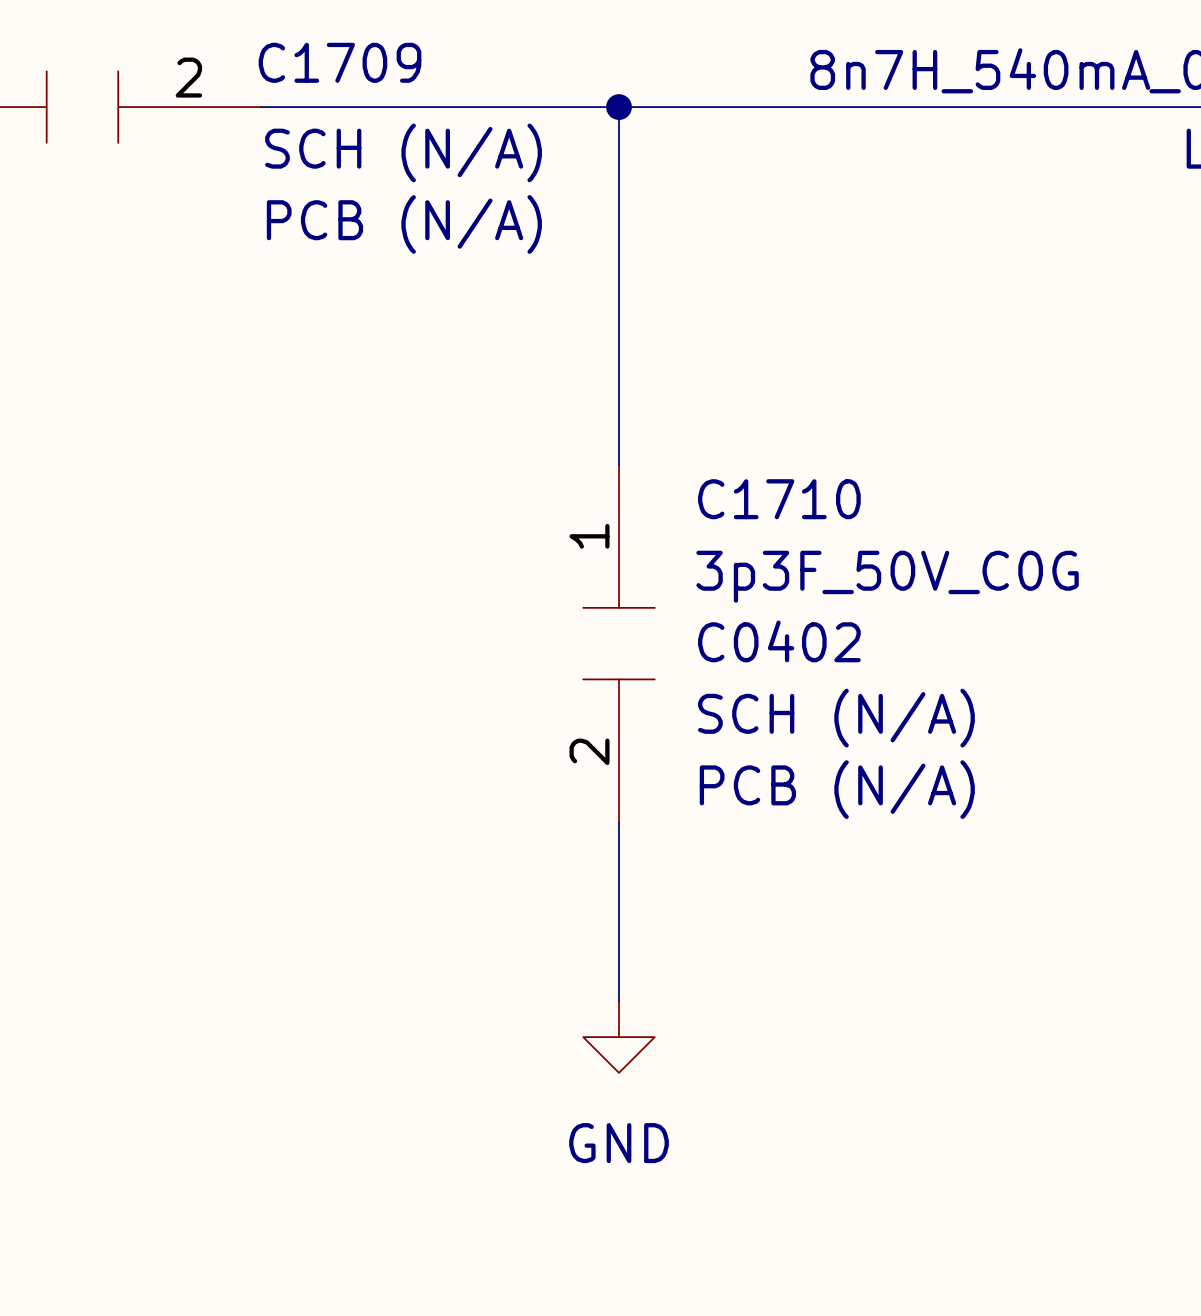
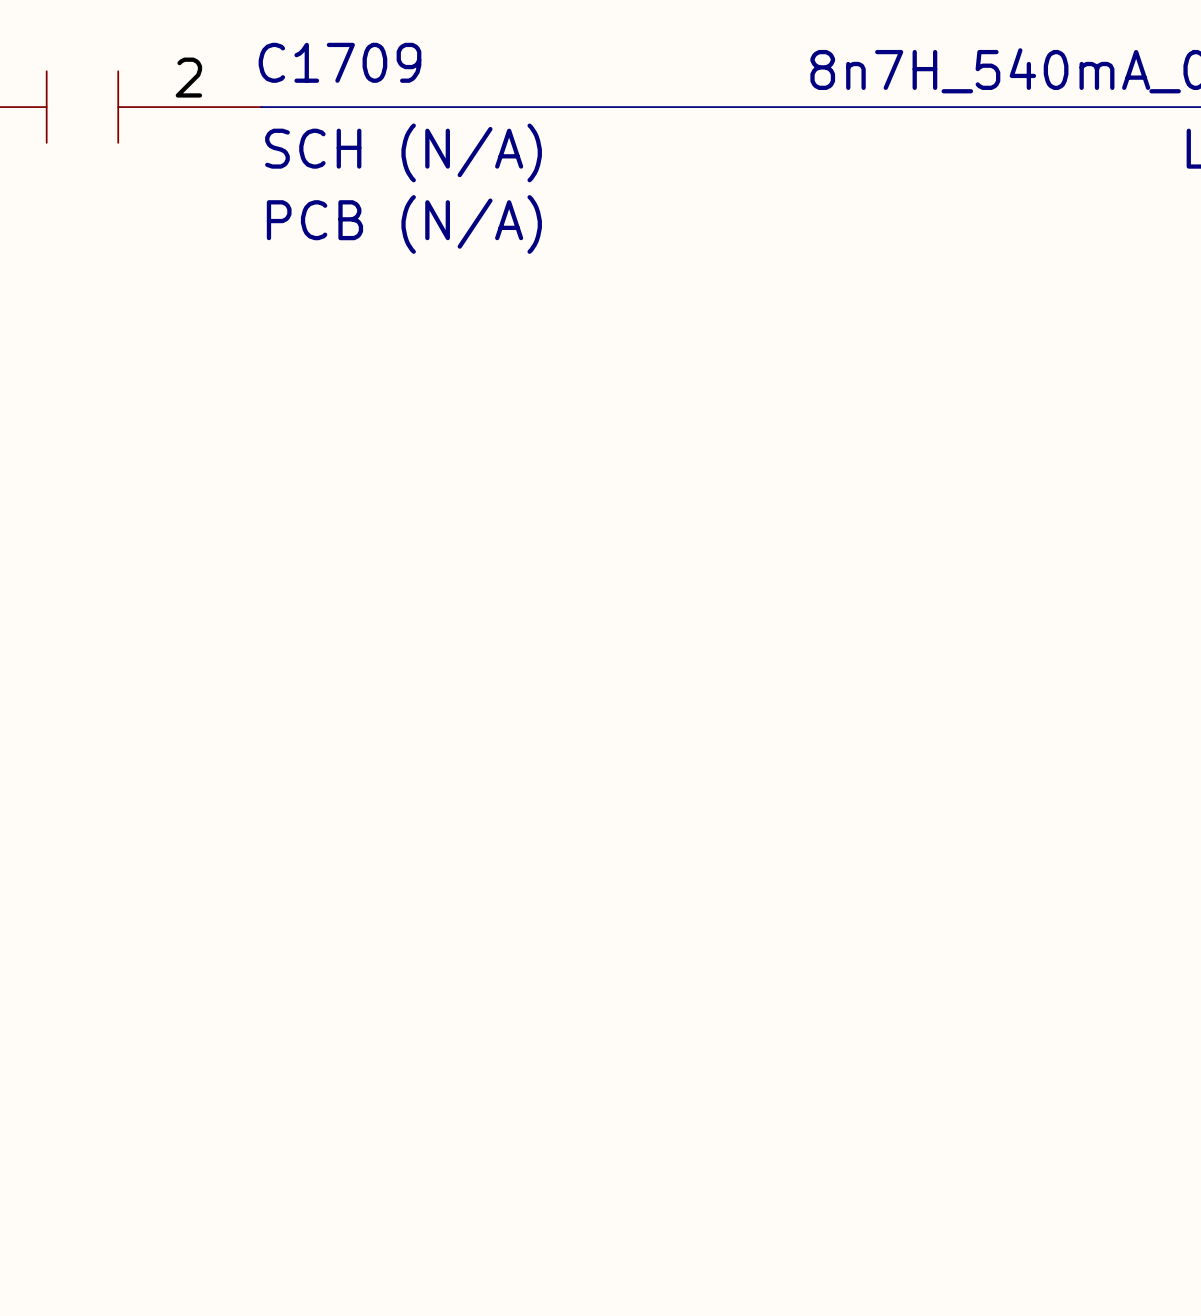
wire: (619, 107) (619, 464) -> none
junction: (619, 107) -> none
C1710: 3p3F_50V_C0G (619, 643) -> none
wire: (619, 822) (619, 1001) -> none
power symbol: GND (619, 1037) -> none

